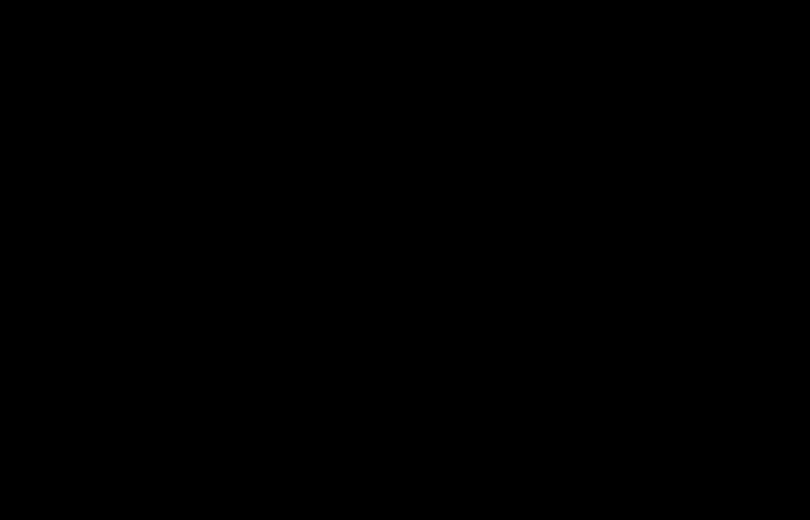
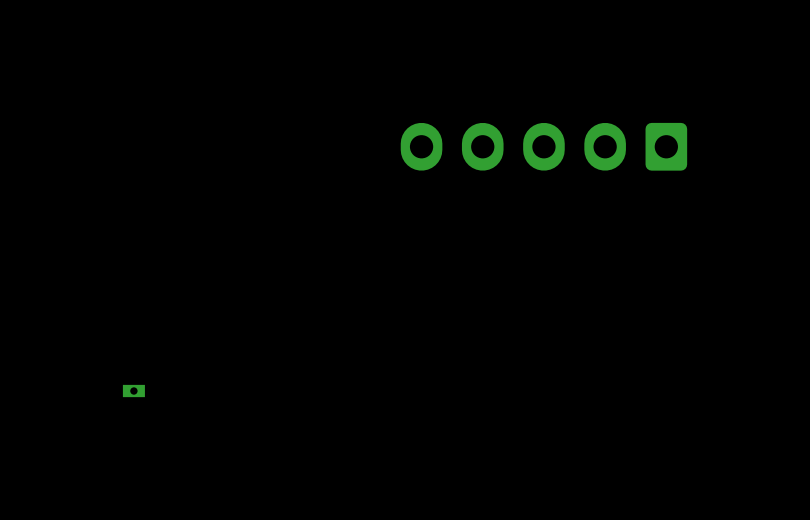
part: none -> (543, 146)
part: none -> (133, 391)

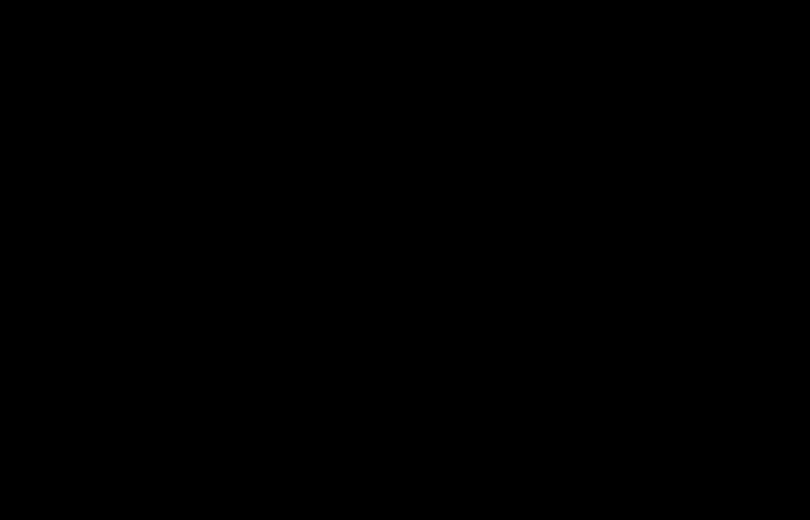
part: (543, 146) -> none
part: (133, 391) -> none

